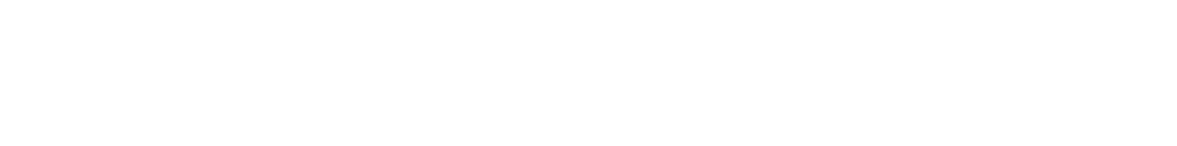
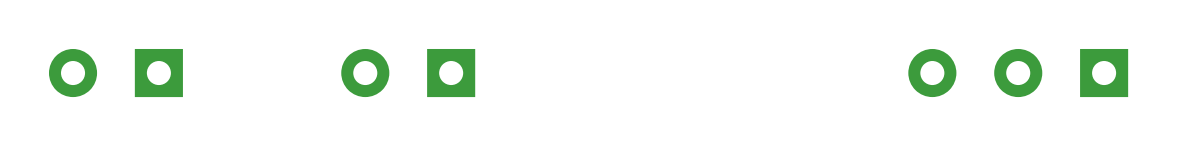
part: none -> (115, 73)
part: none -> (408, 73)
part: none -> (1018, 73)

